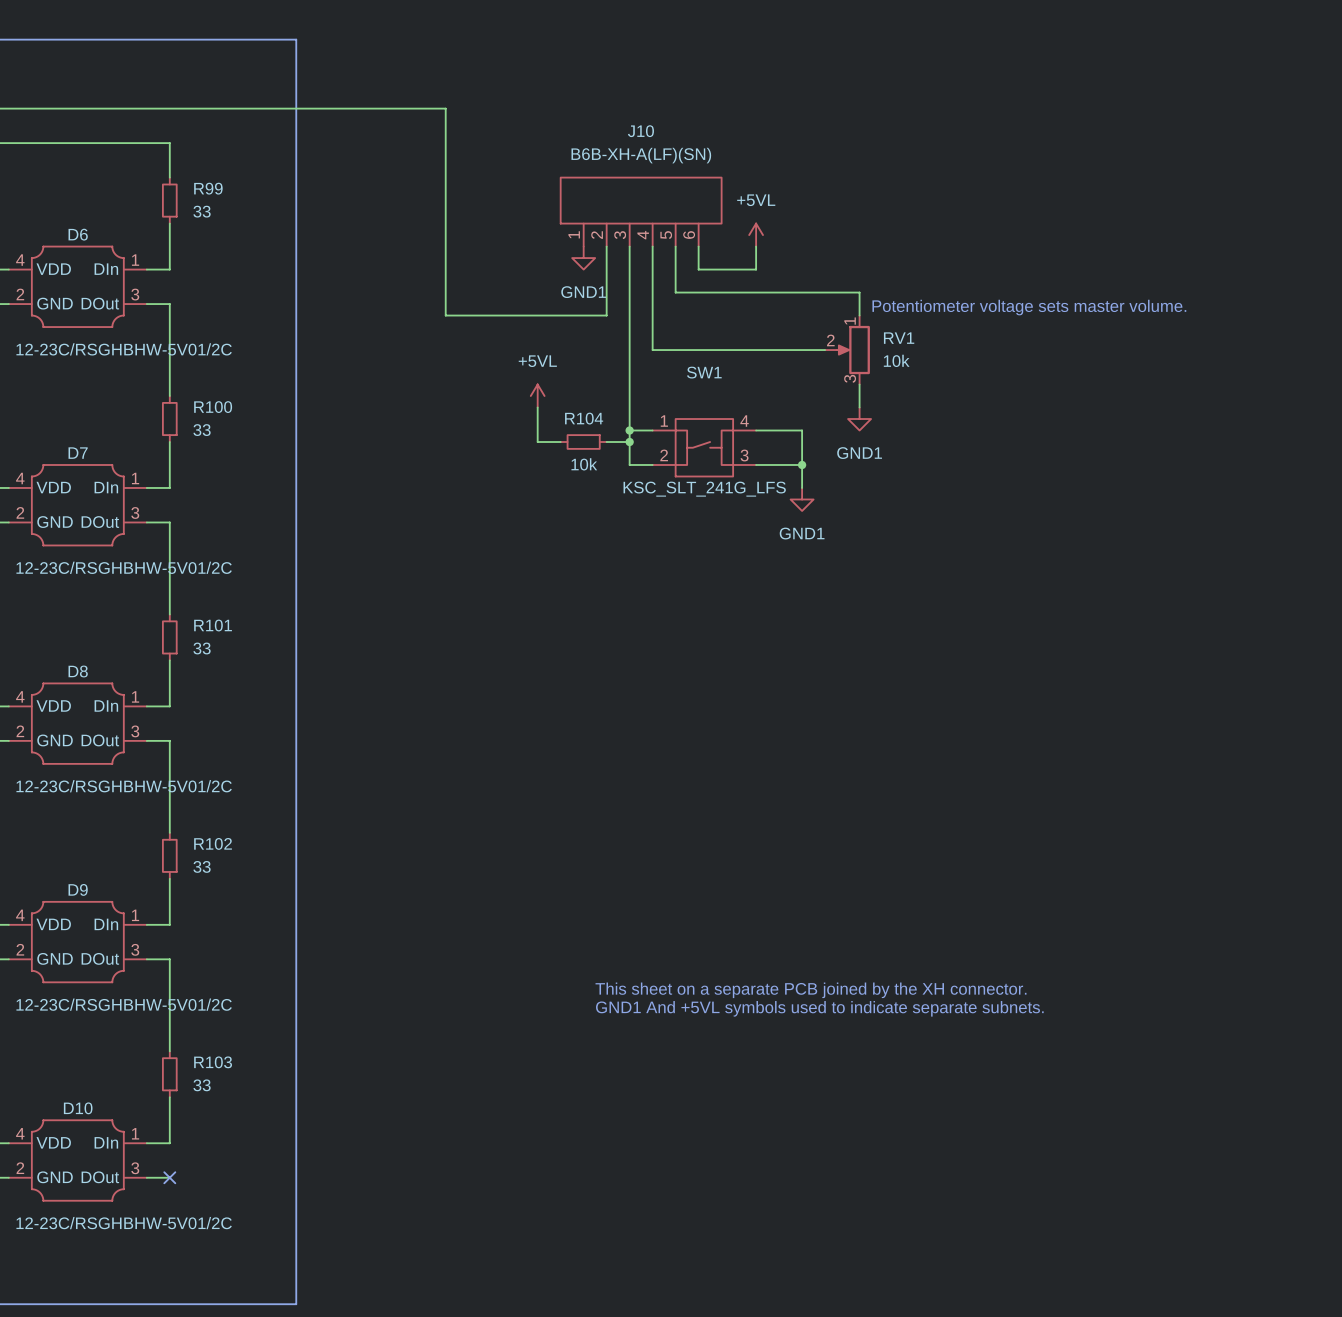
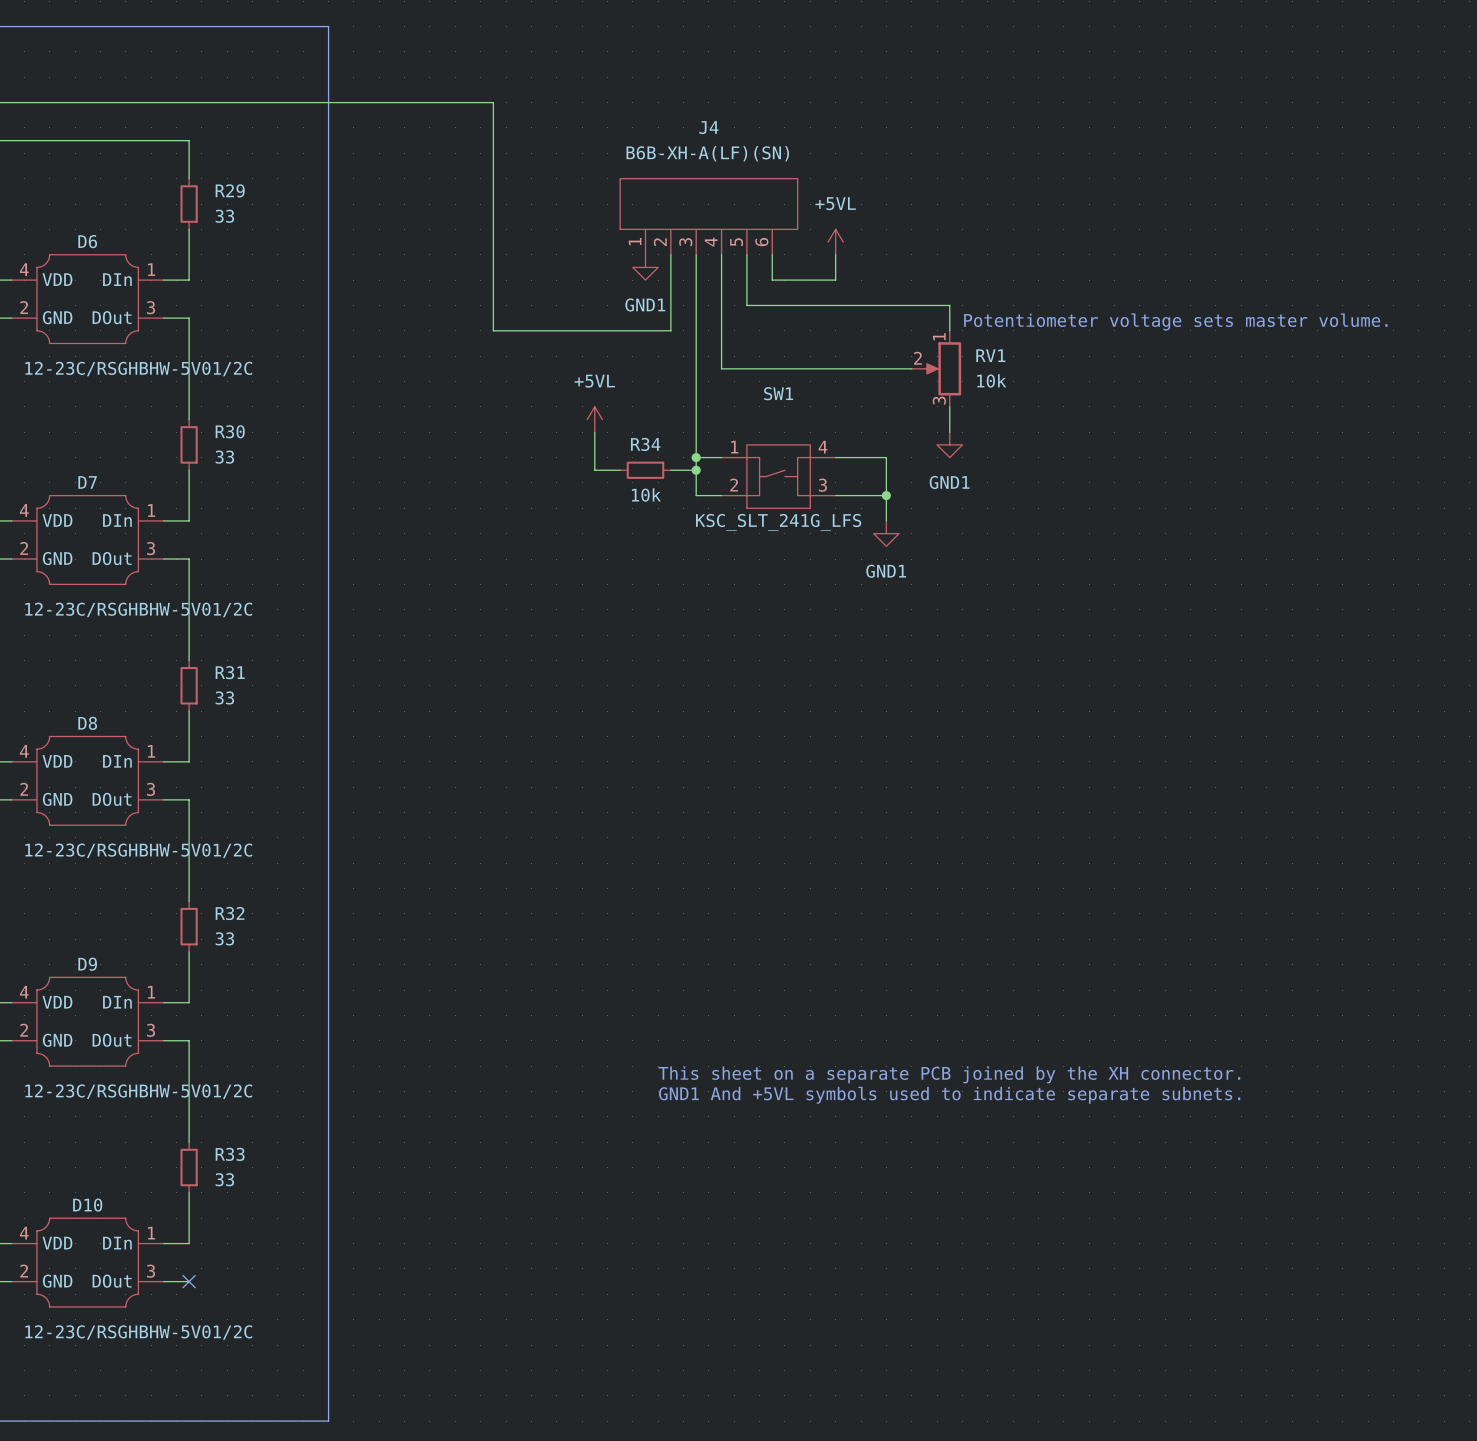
J10 name: J10 (640, 131) -> J4 (708, 127)
R99 name: R99 (208, 188) -> R29 (230, 190)
R100 name: R100 (213, 407) -> R30 (230, 431)
R104 name: R104 (584, 418) -> R34 (645, 444)
R101 name: R101 (213, 625) -> R31 (230, 672)
R102 name: R102 (213, 843) -> R32 (230, 913)
R103 name: R103 (213, 1062) -> R33 (230, 1154)

